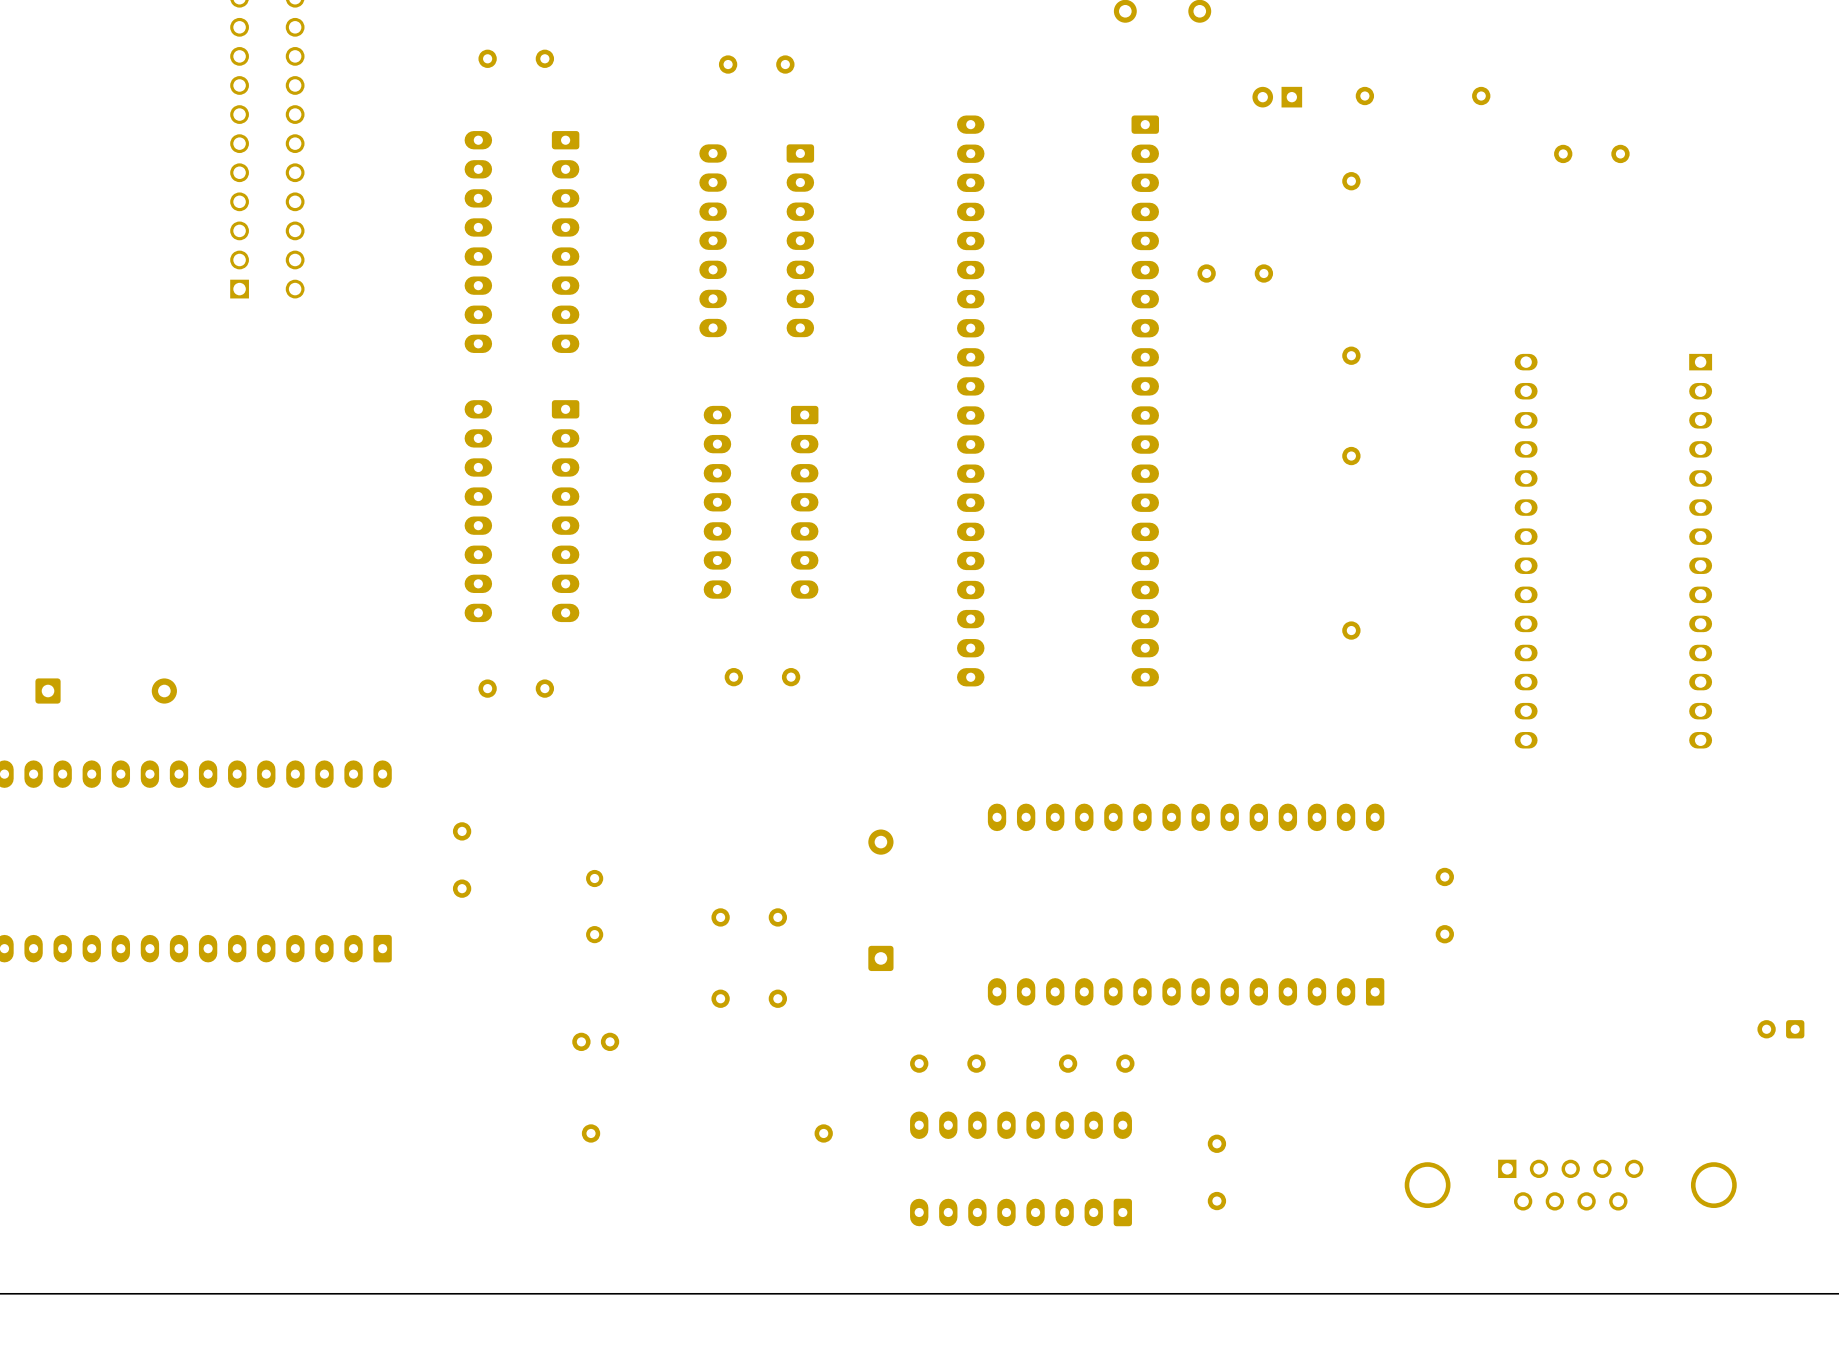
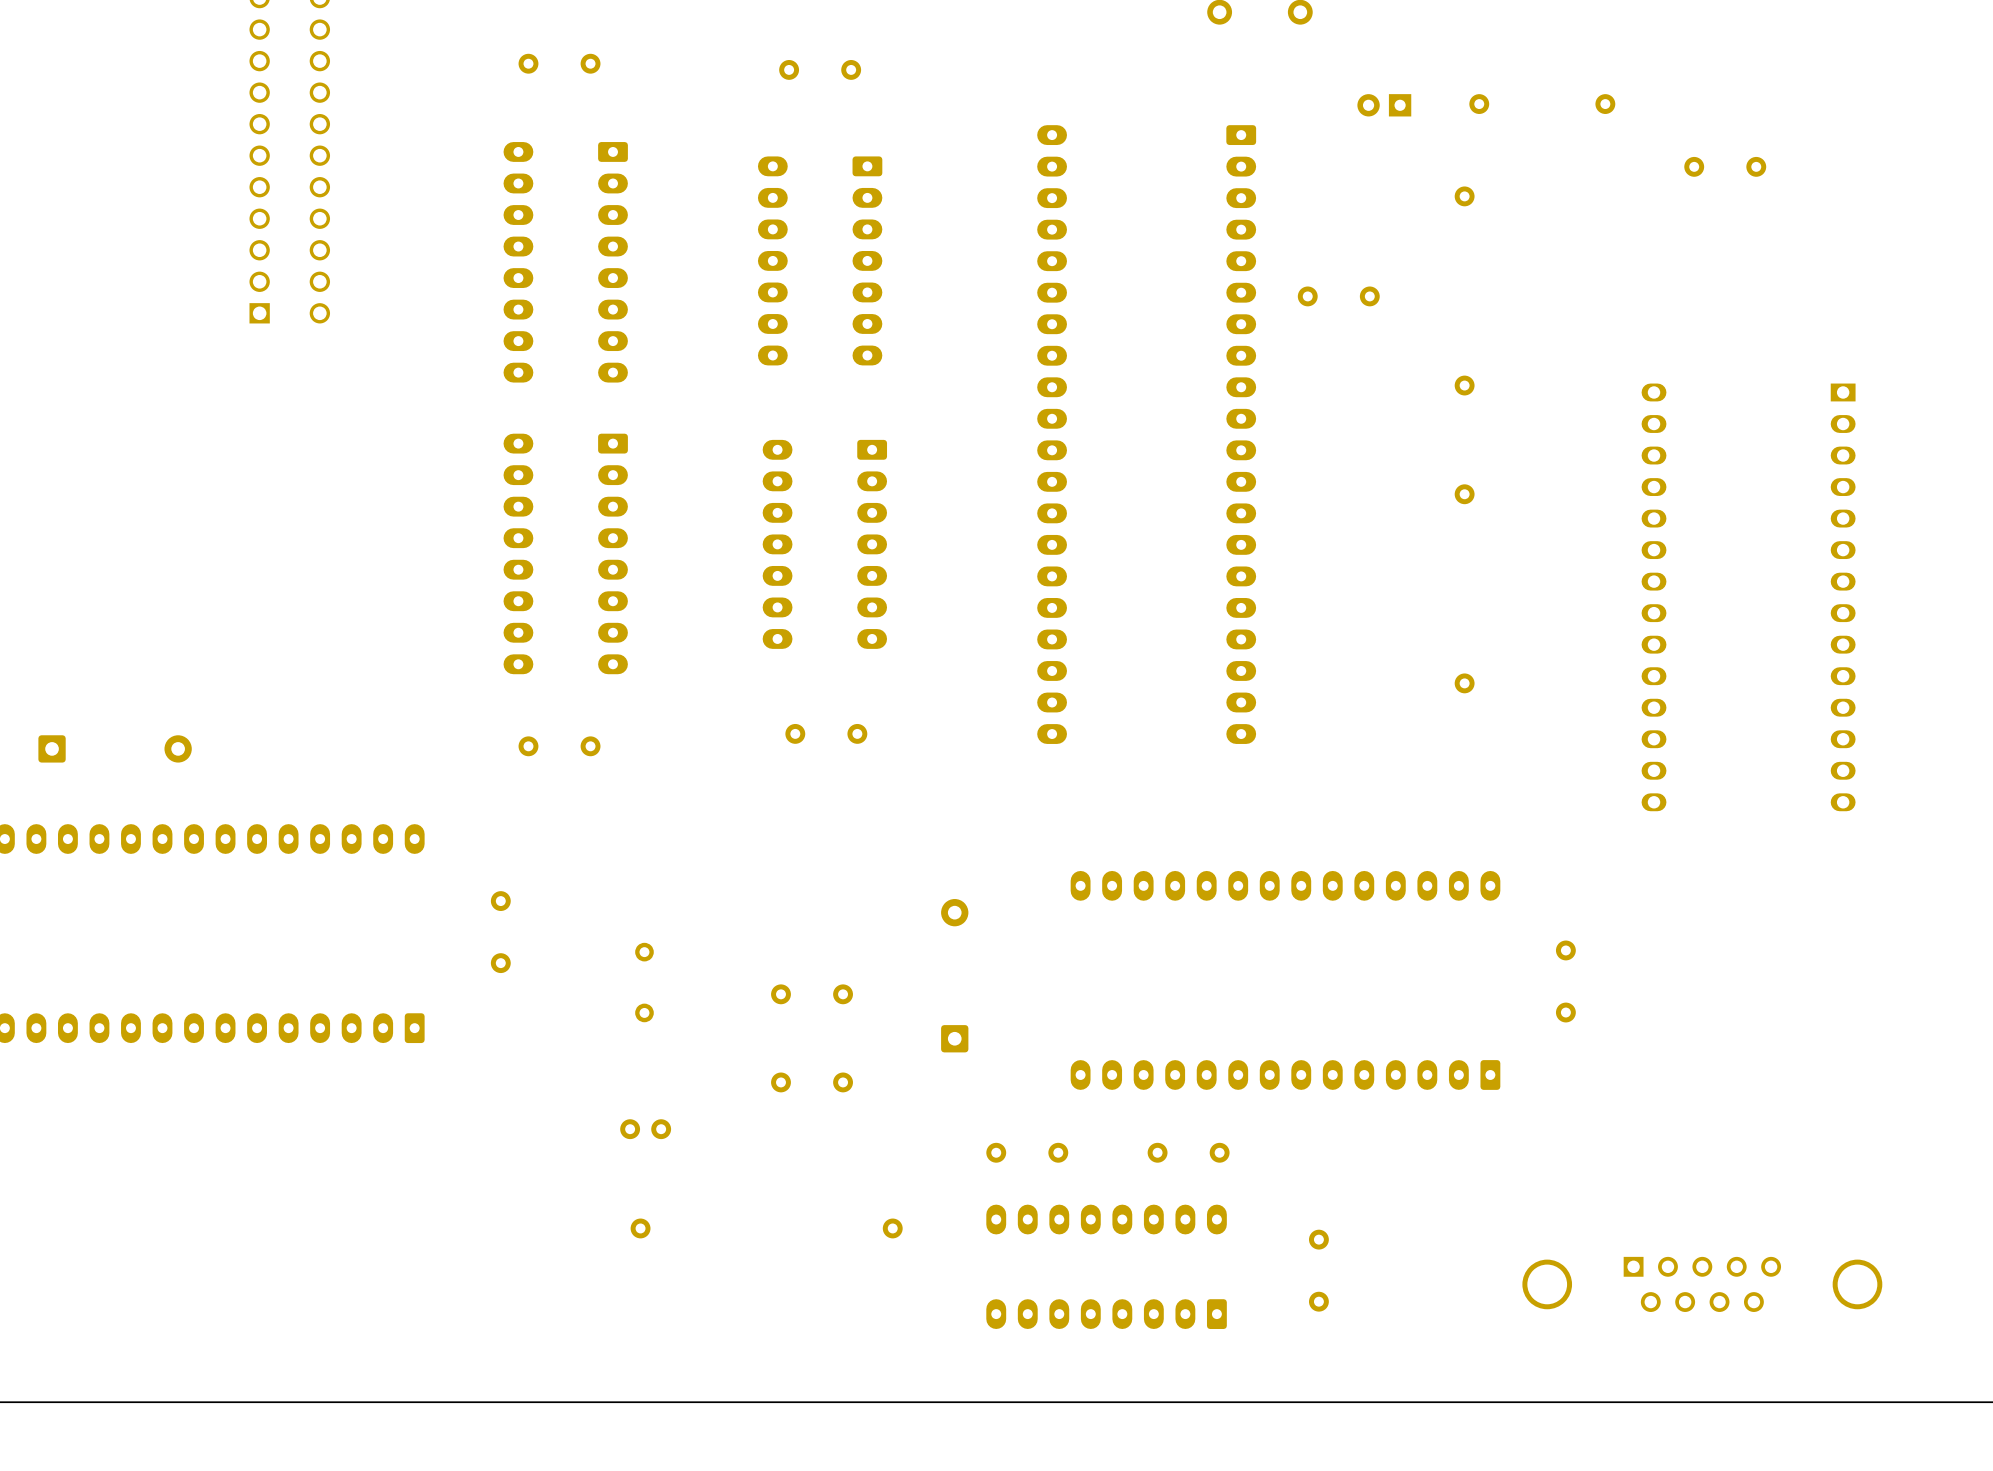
part: (1780, 1029) -> none

